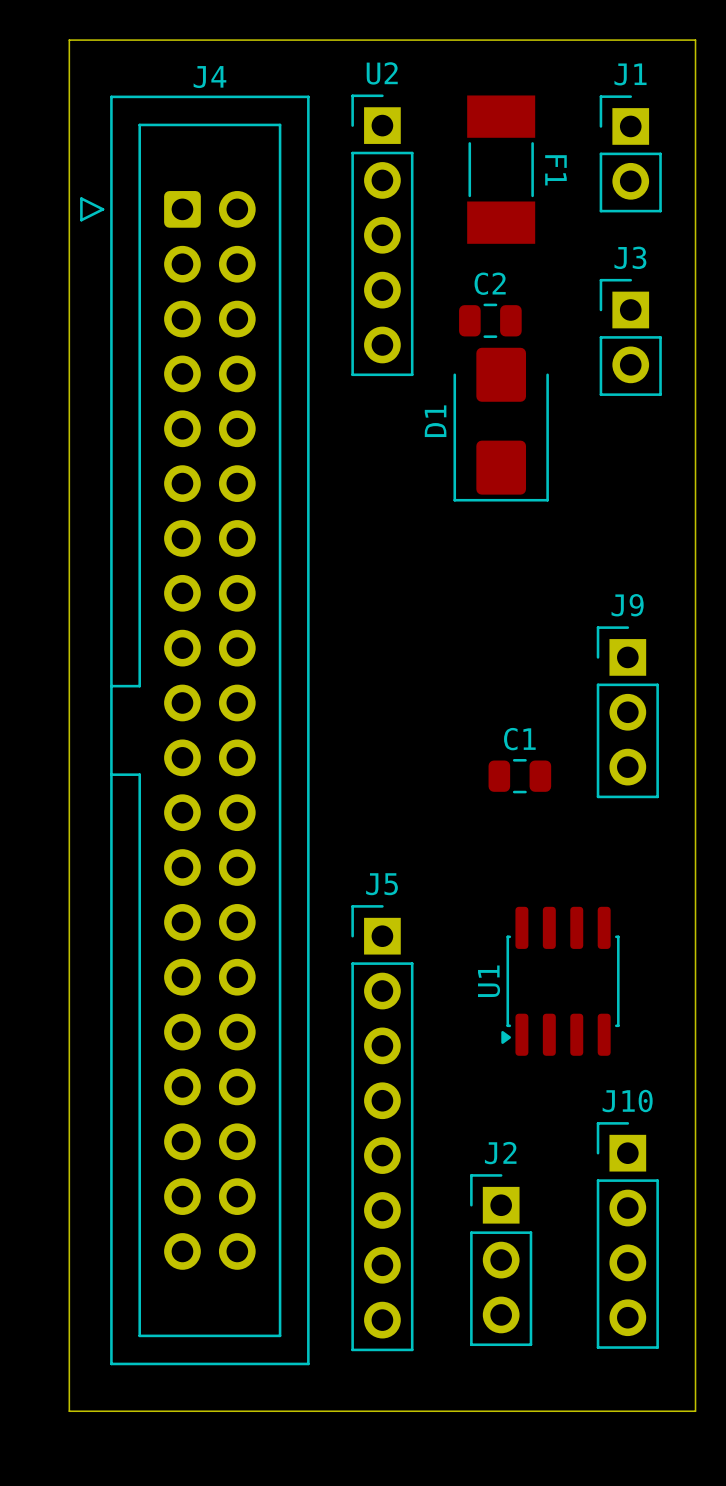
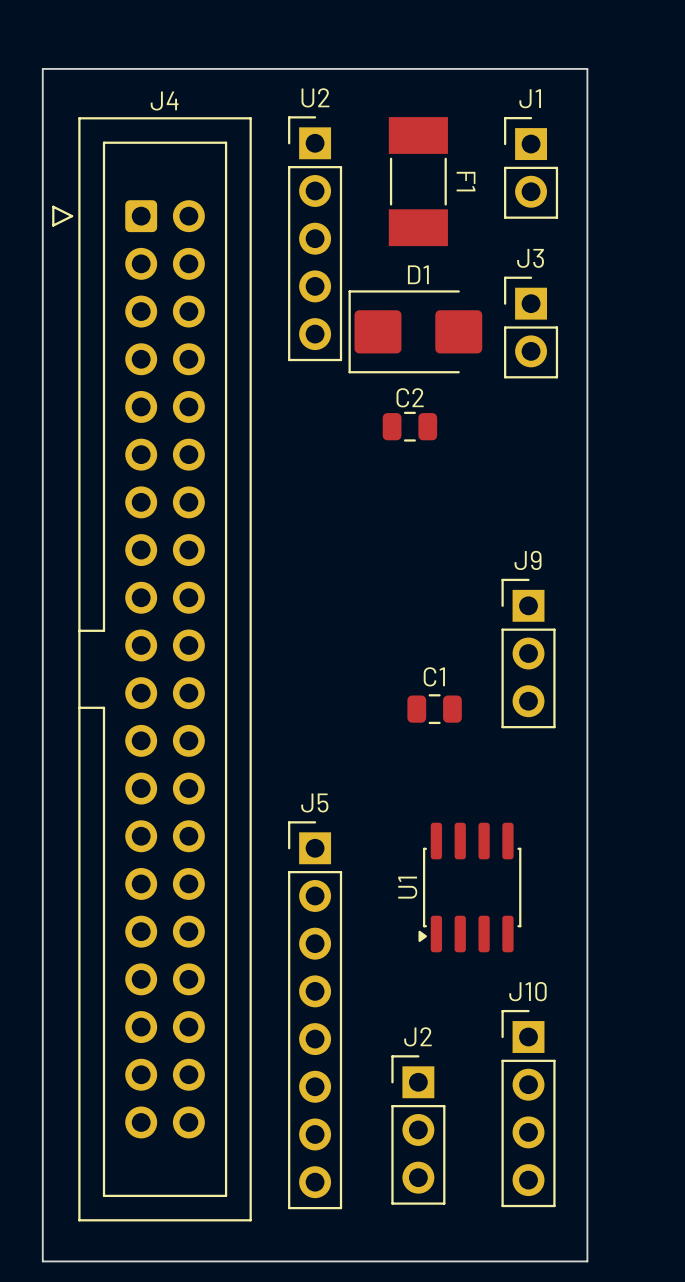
C2: (490, 320) -> none
text: none -> C2 (410, 397)
D1 rotation: 0° (501, 424) -> 90° clockwise (415, 331)
part: none -> (409, 426)

